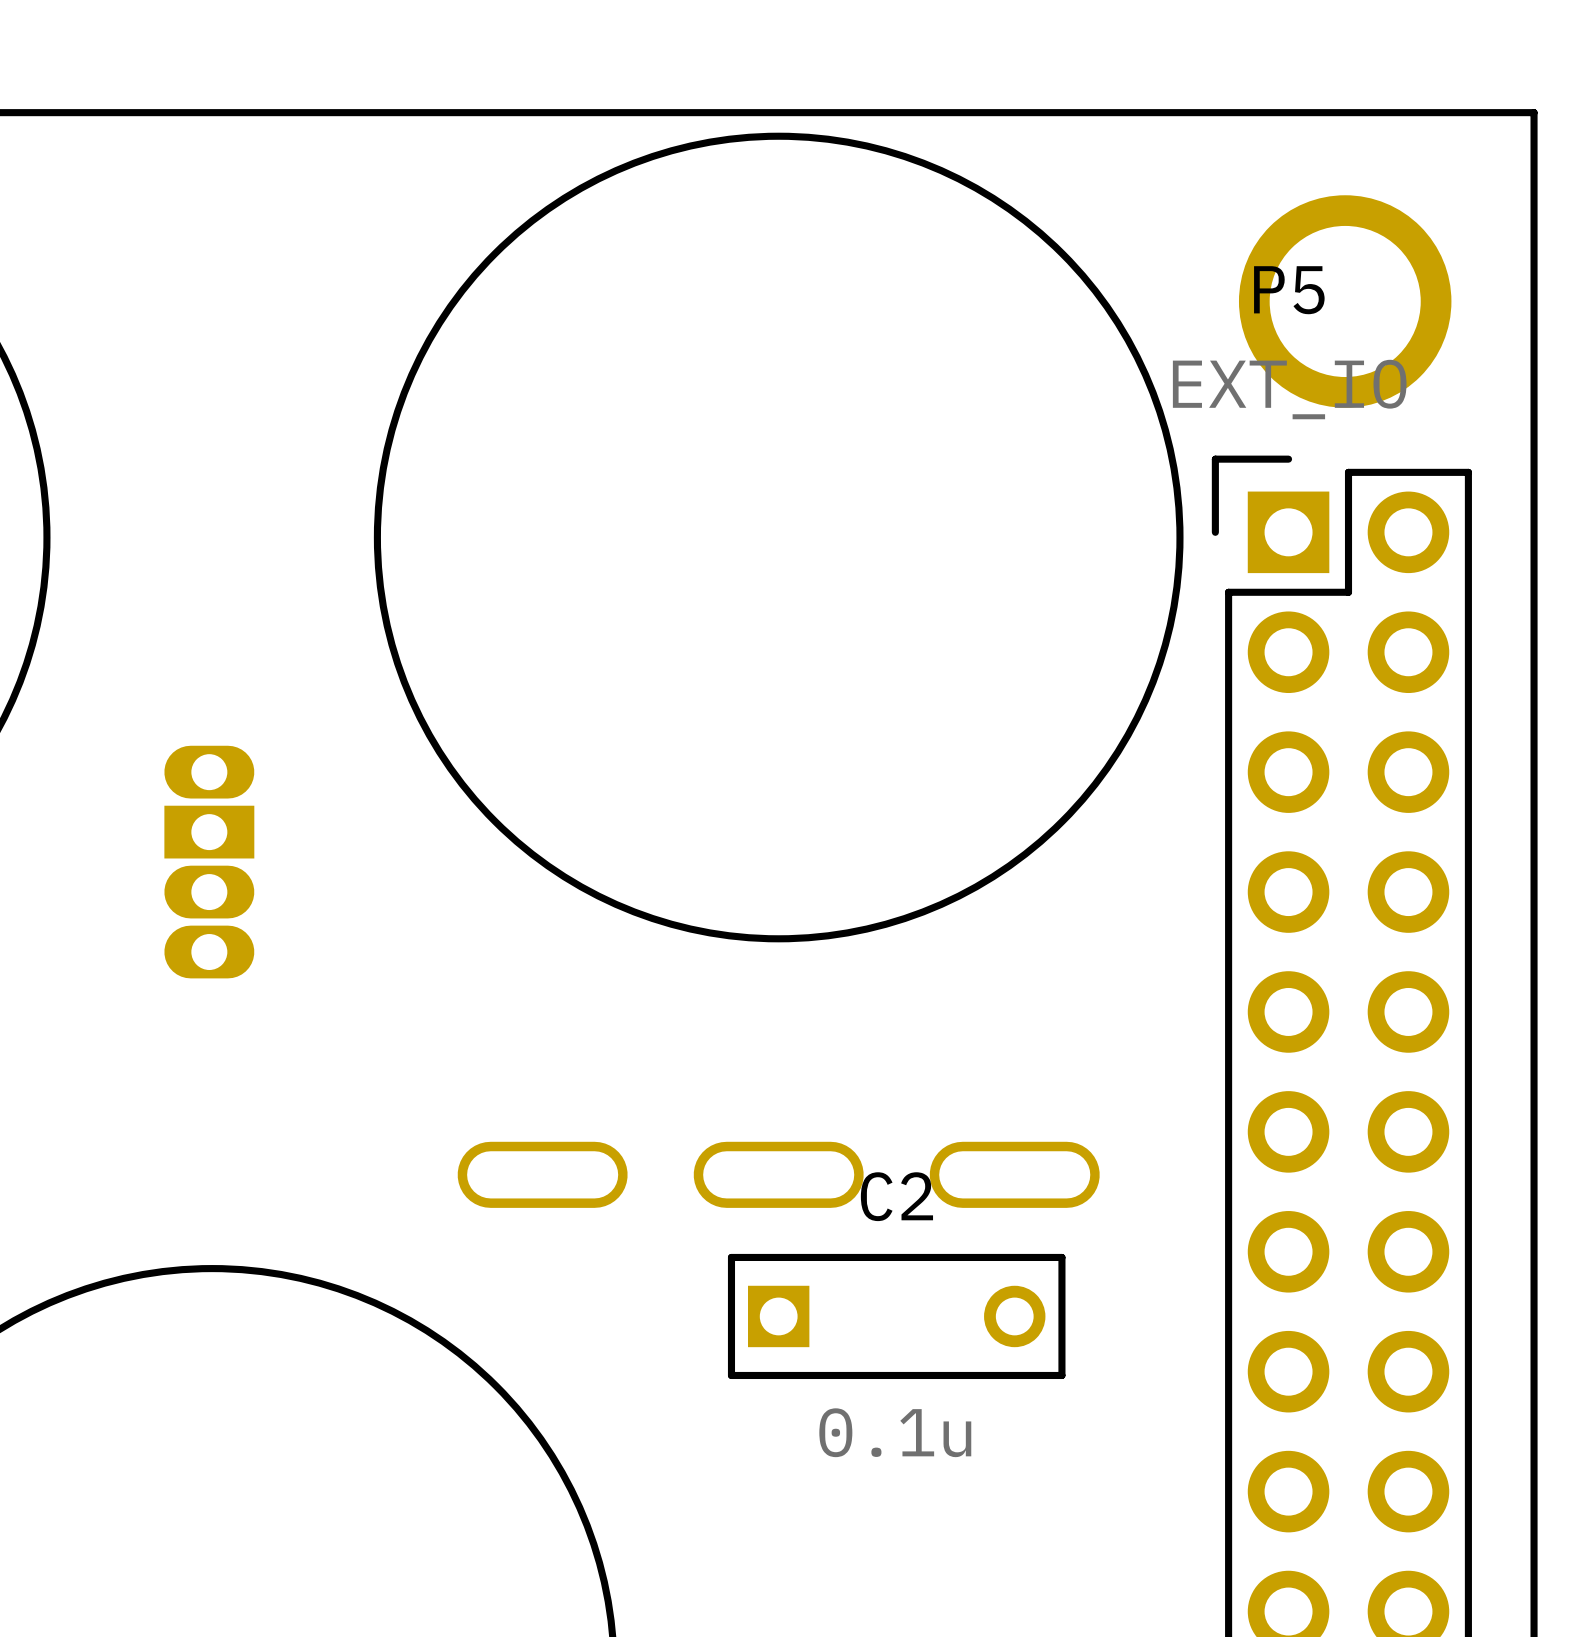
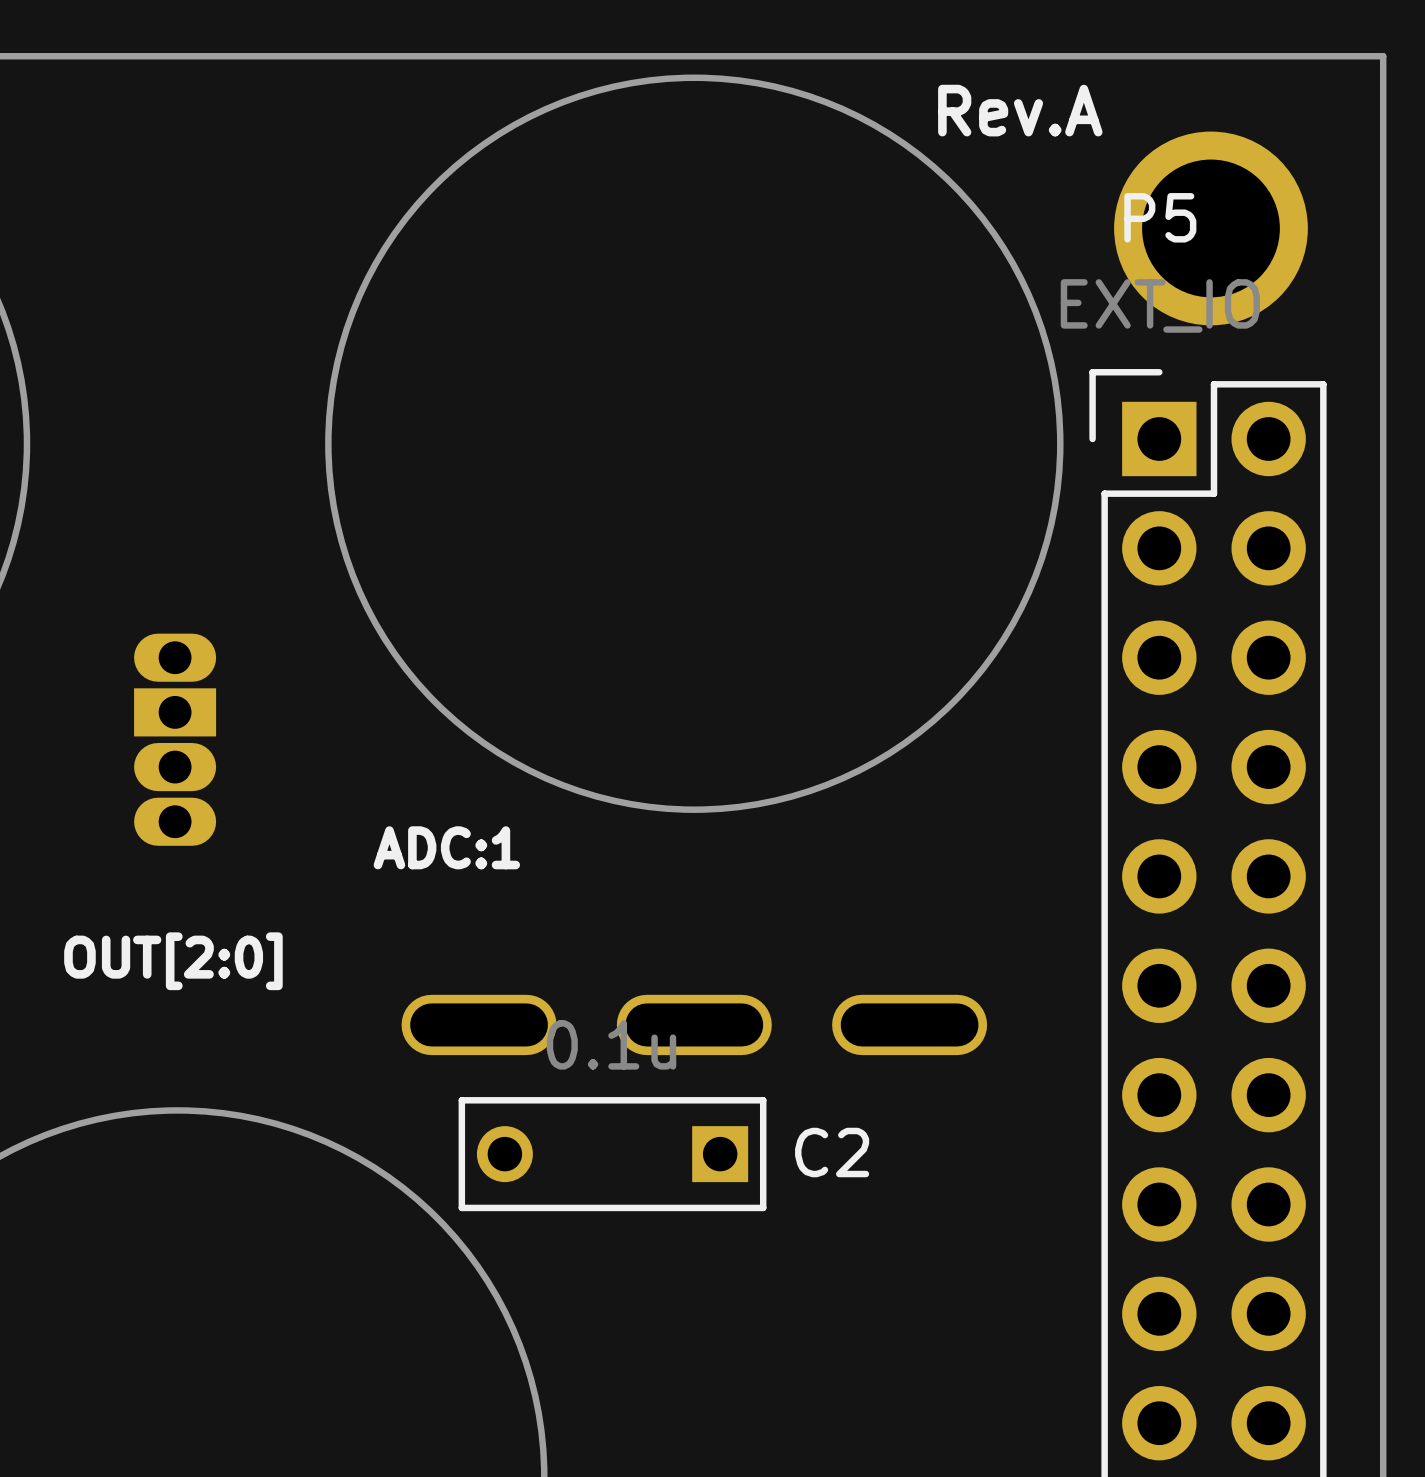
text: none -> Rev.A (1020, 110)
text: none -> ADC:1 (446, 847)
text: none -> OUT[2:0] (173, 961)
C2 name position: C2 (896, 1196) -> C2 (832, 1152)
C2 rotation: 0° (896, 1316) -> 180° (612, 1154)
C2 position: (896, 1316) -> (612, 1154)

